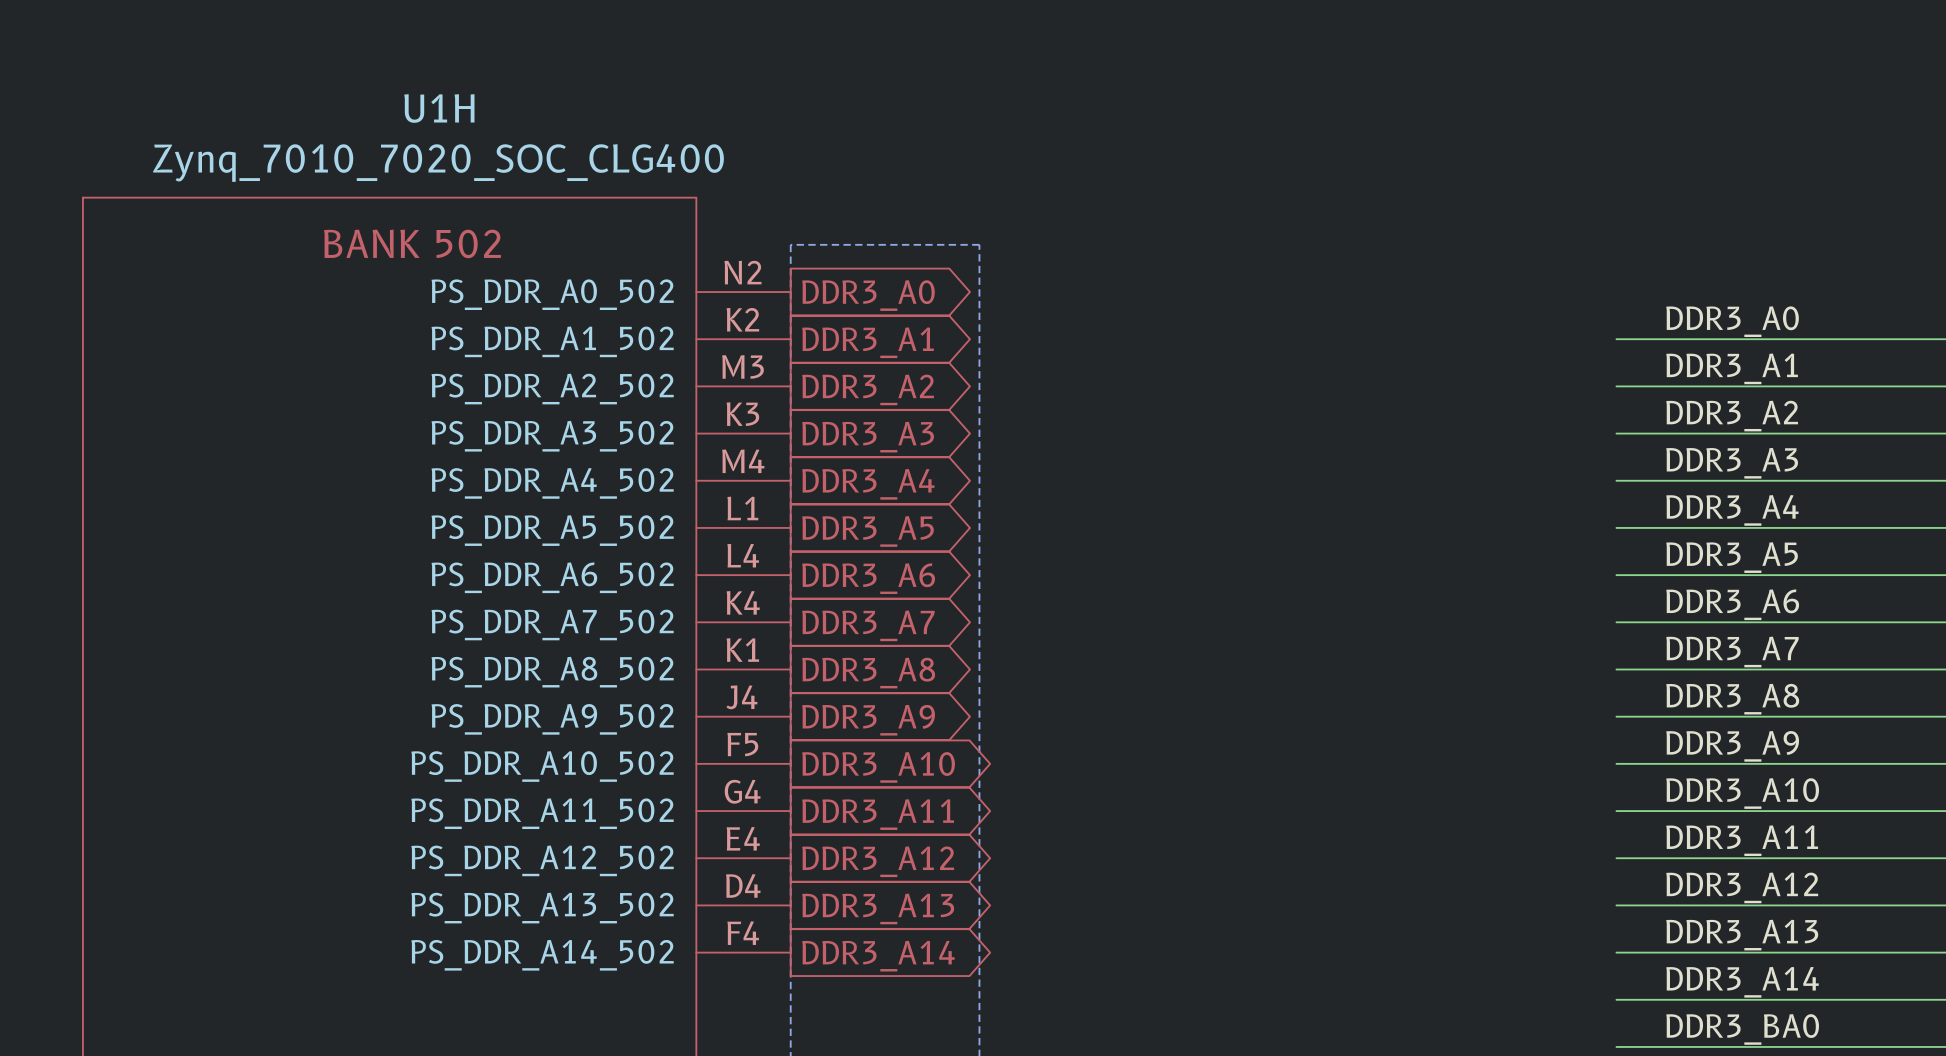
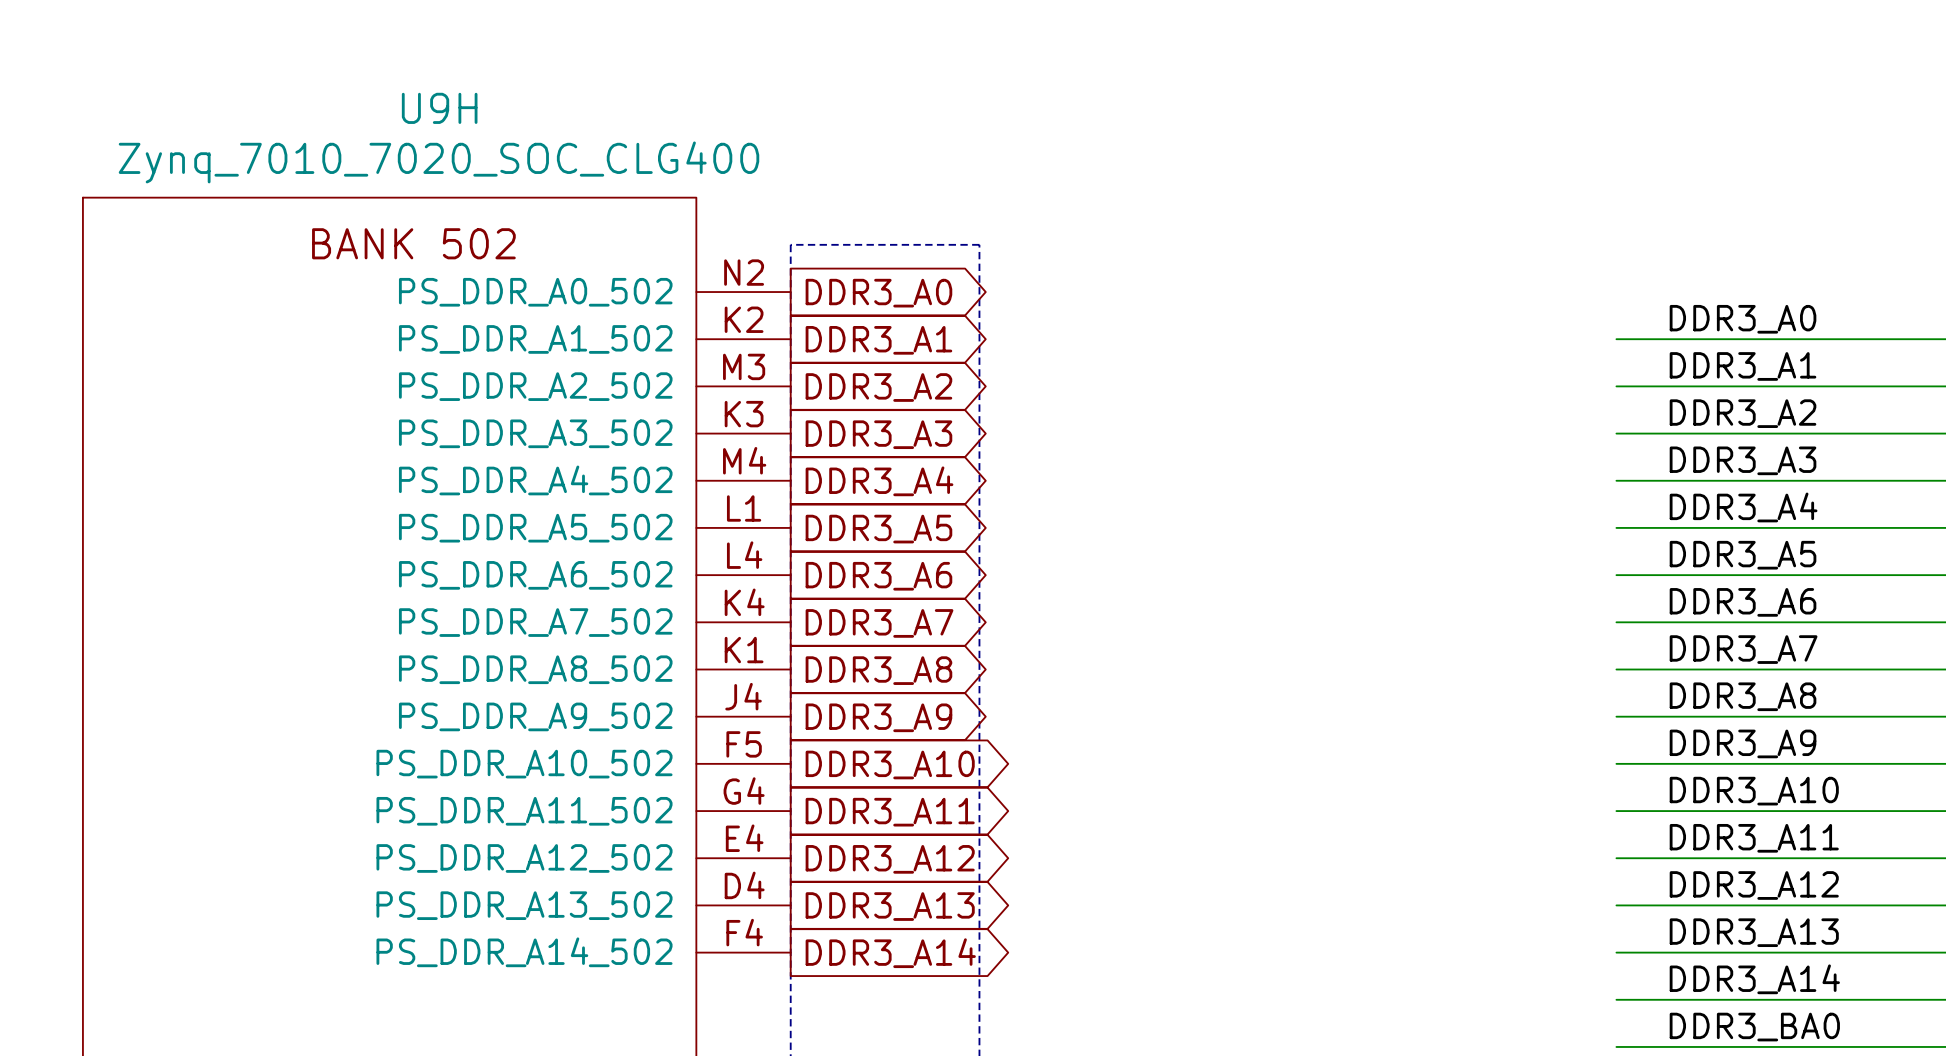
U1H name: U1H (439, 108) -> U9H (439, 108)

